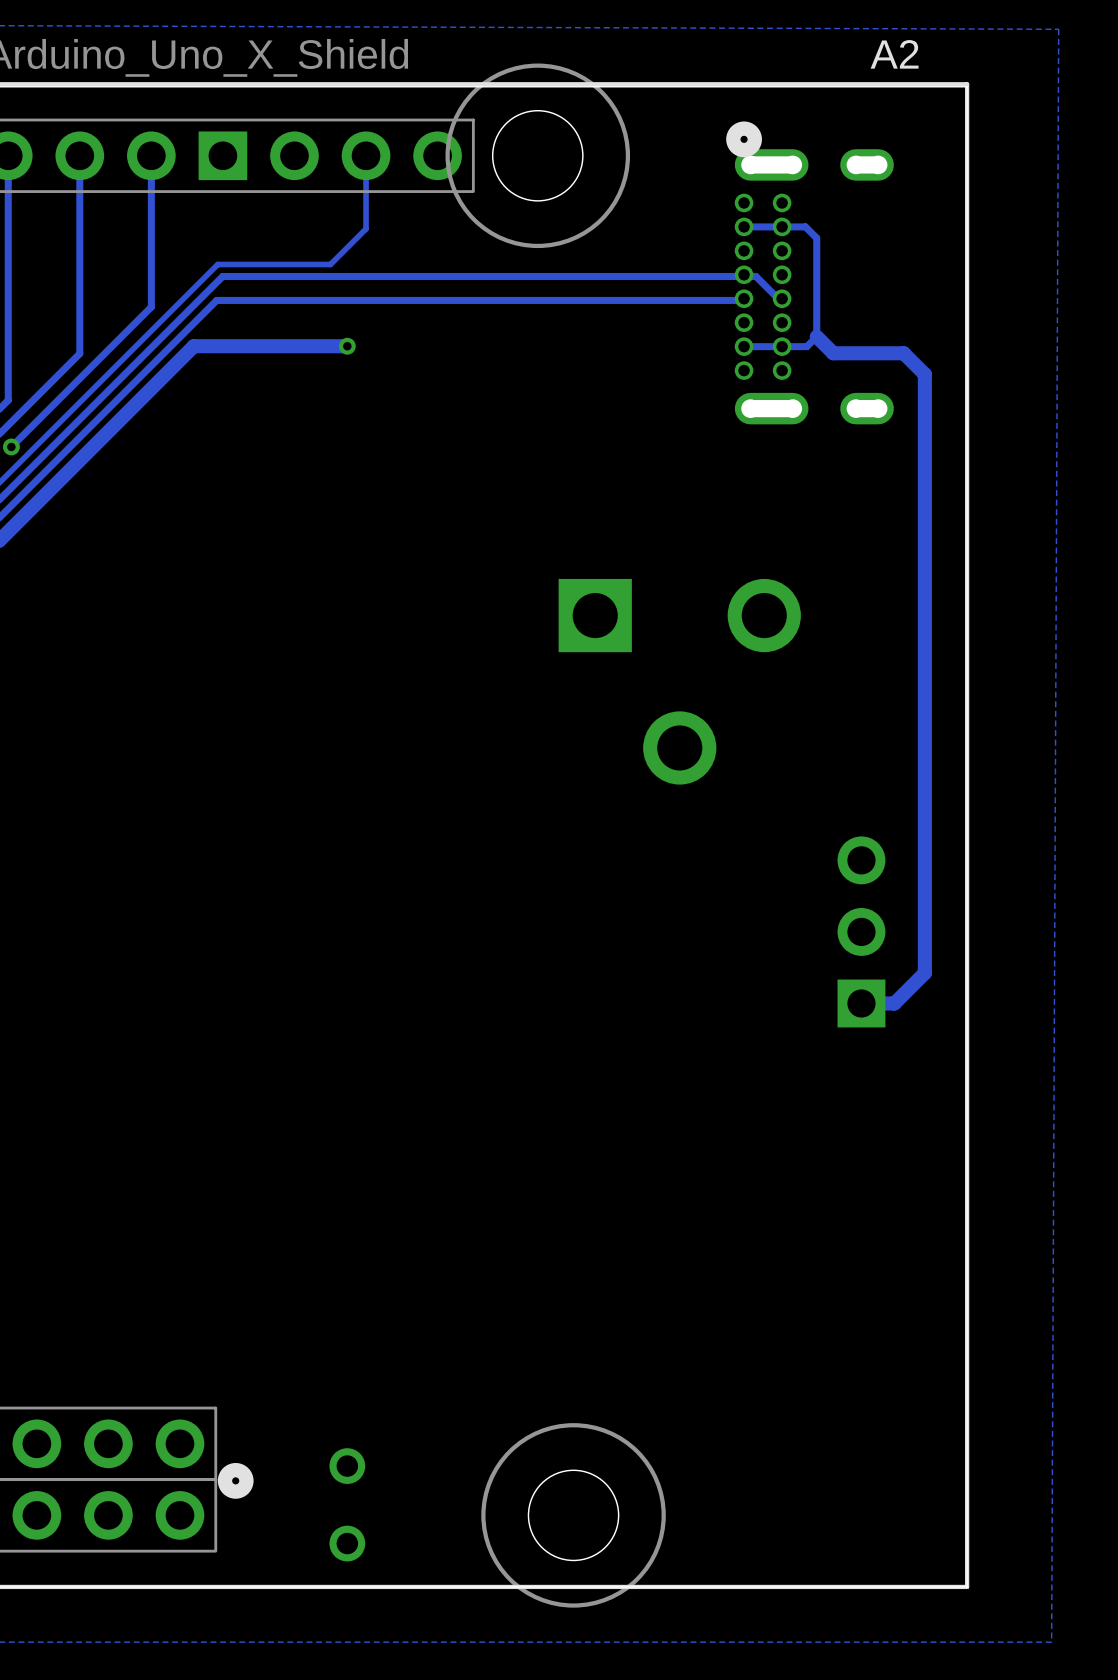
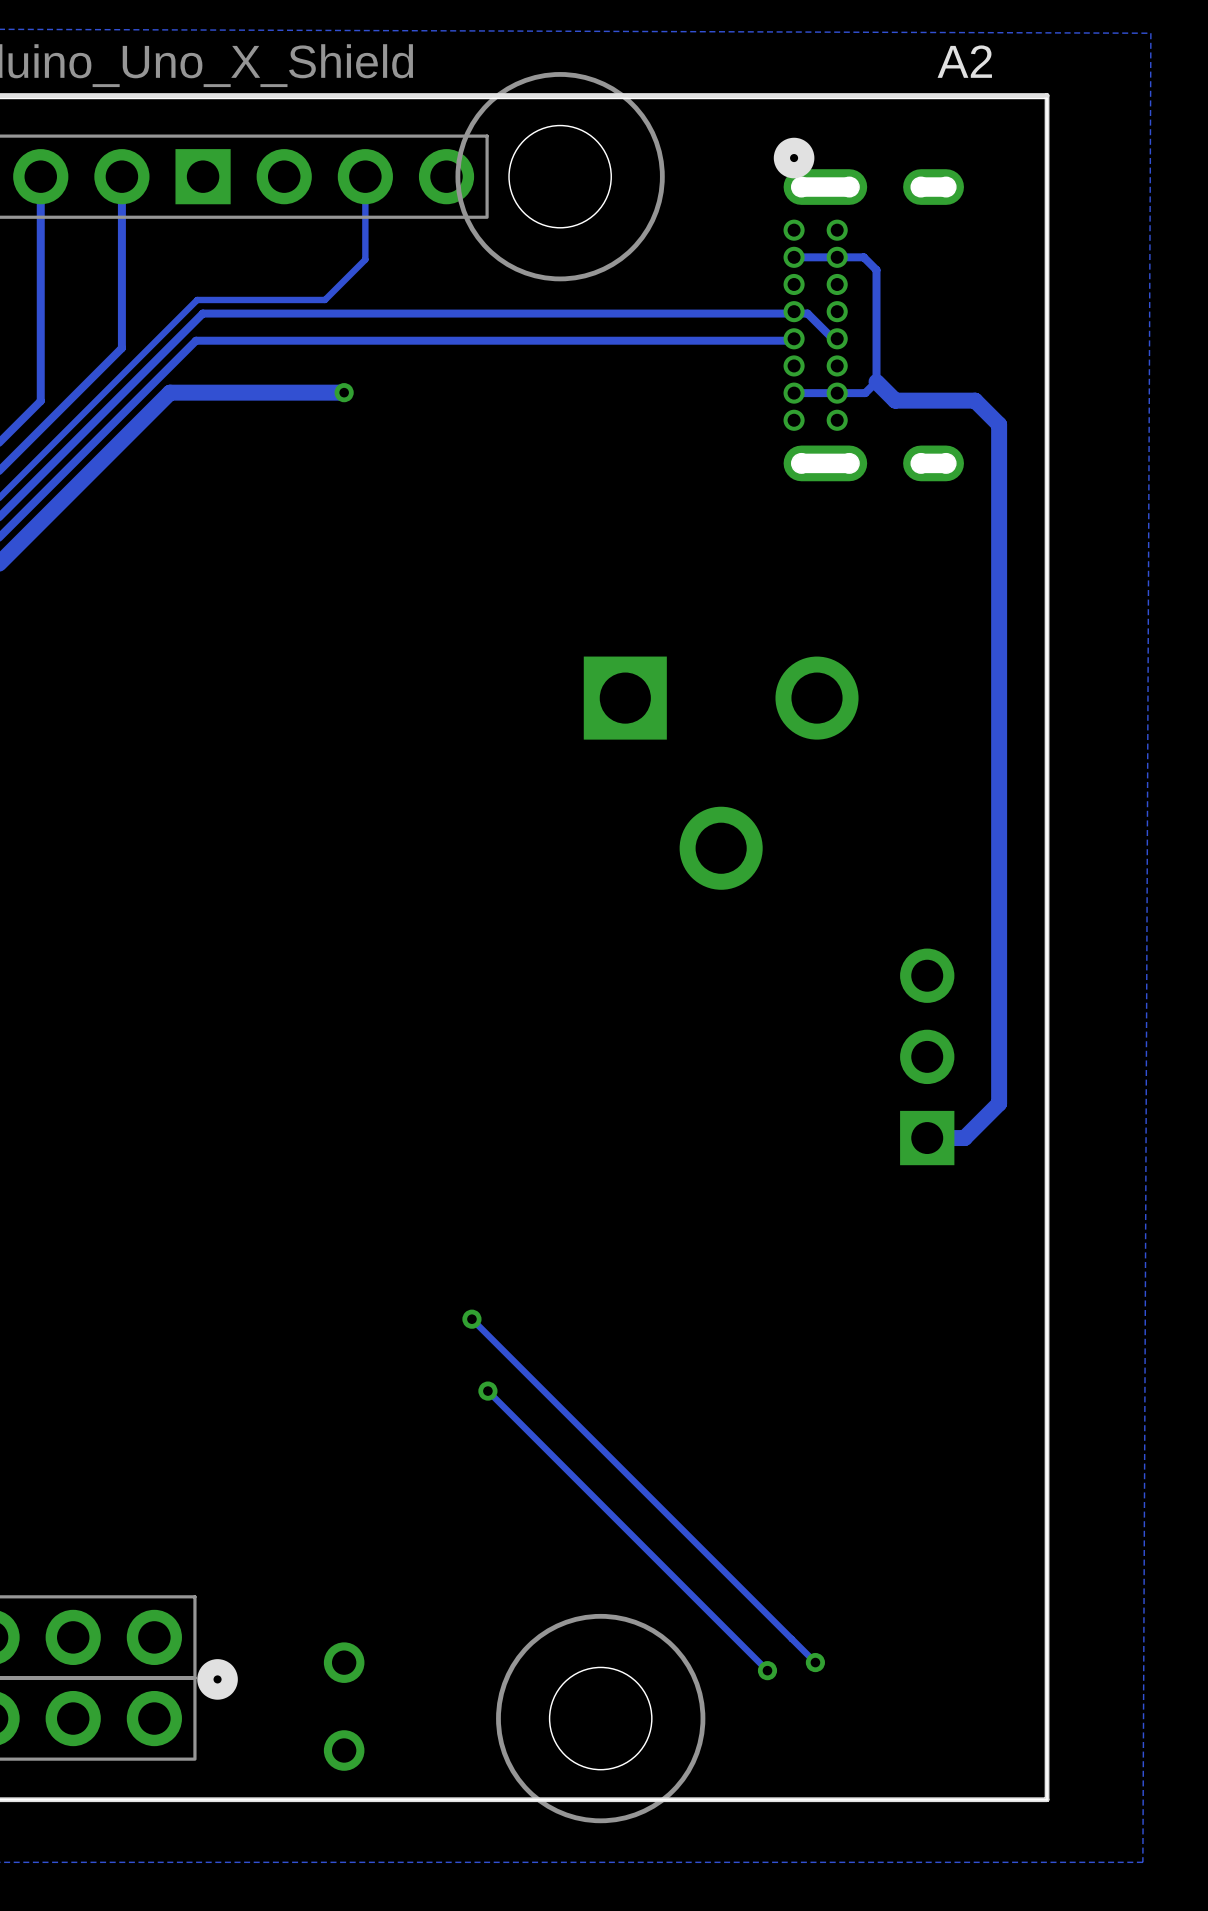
track: none -> (471, 1319) (815, 1662)
via: none -> (471, 1319)
track: none -> (487, 1391) (767, 1670)
via: none -> (487, 1391)
via: none -> (815, 1662)
via: none -> (767, 1670)

